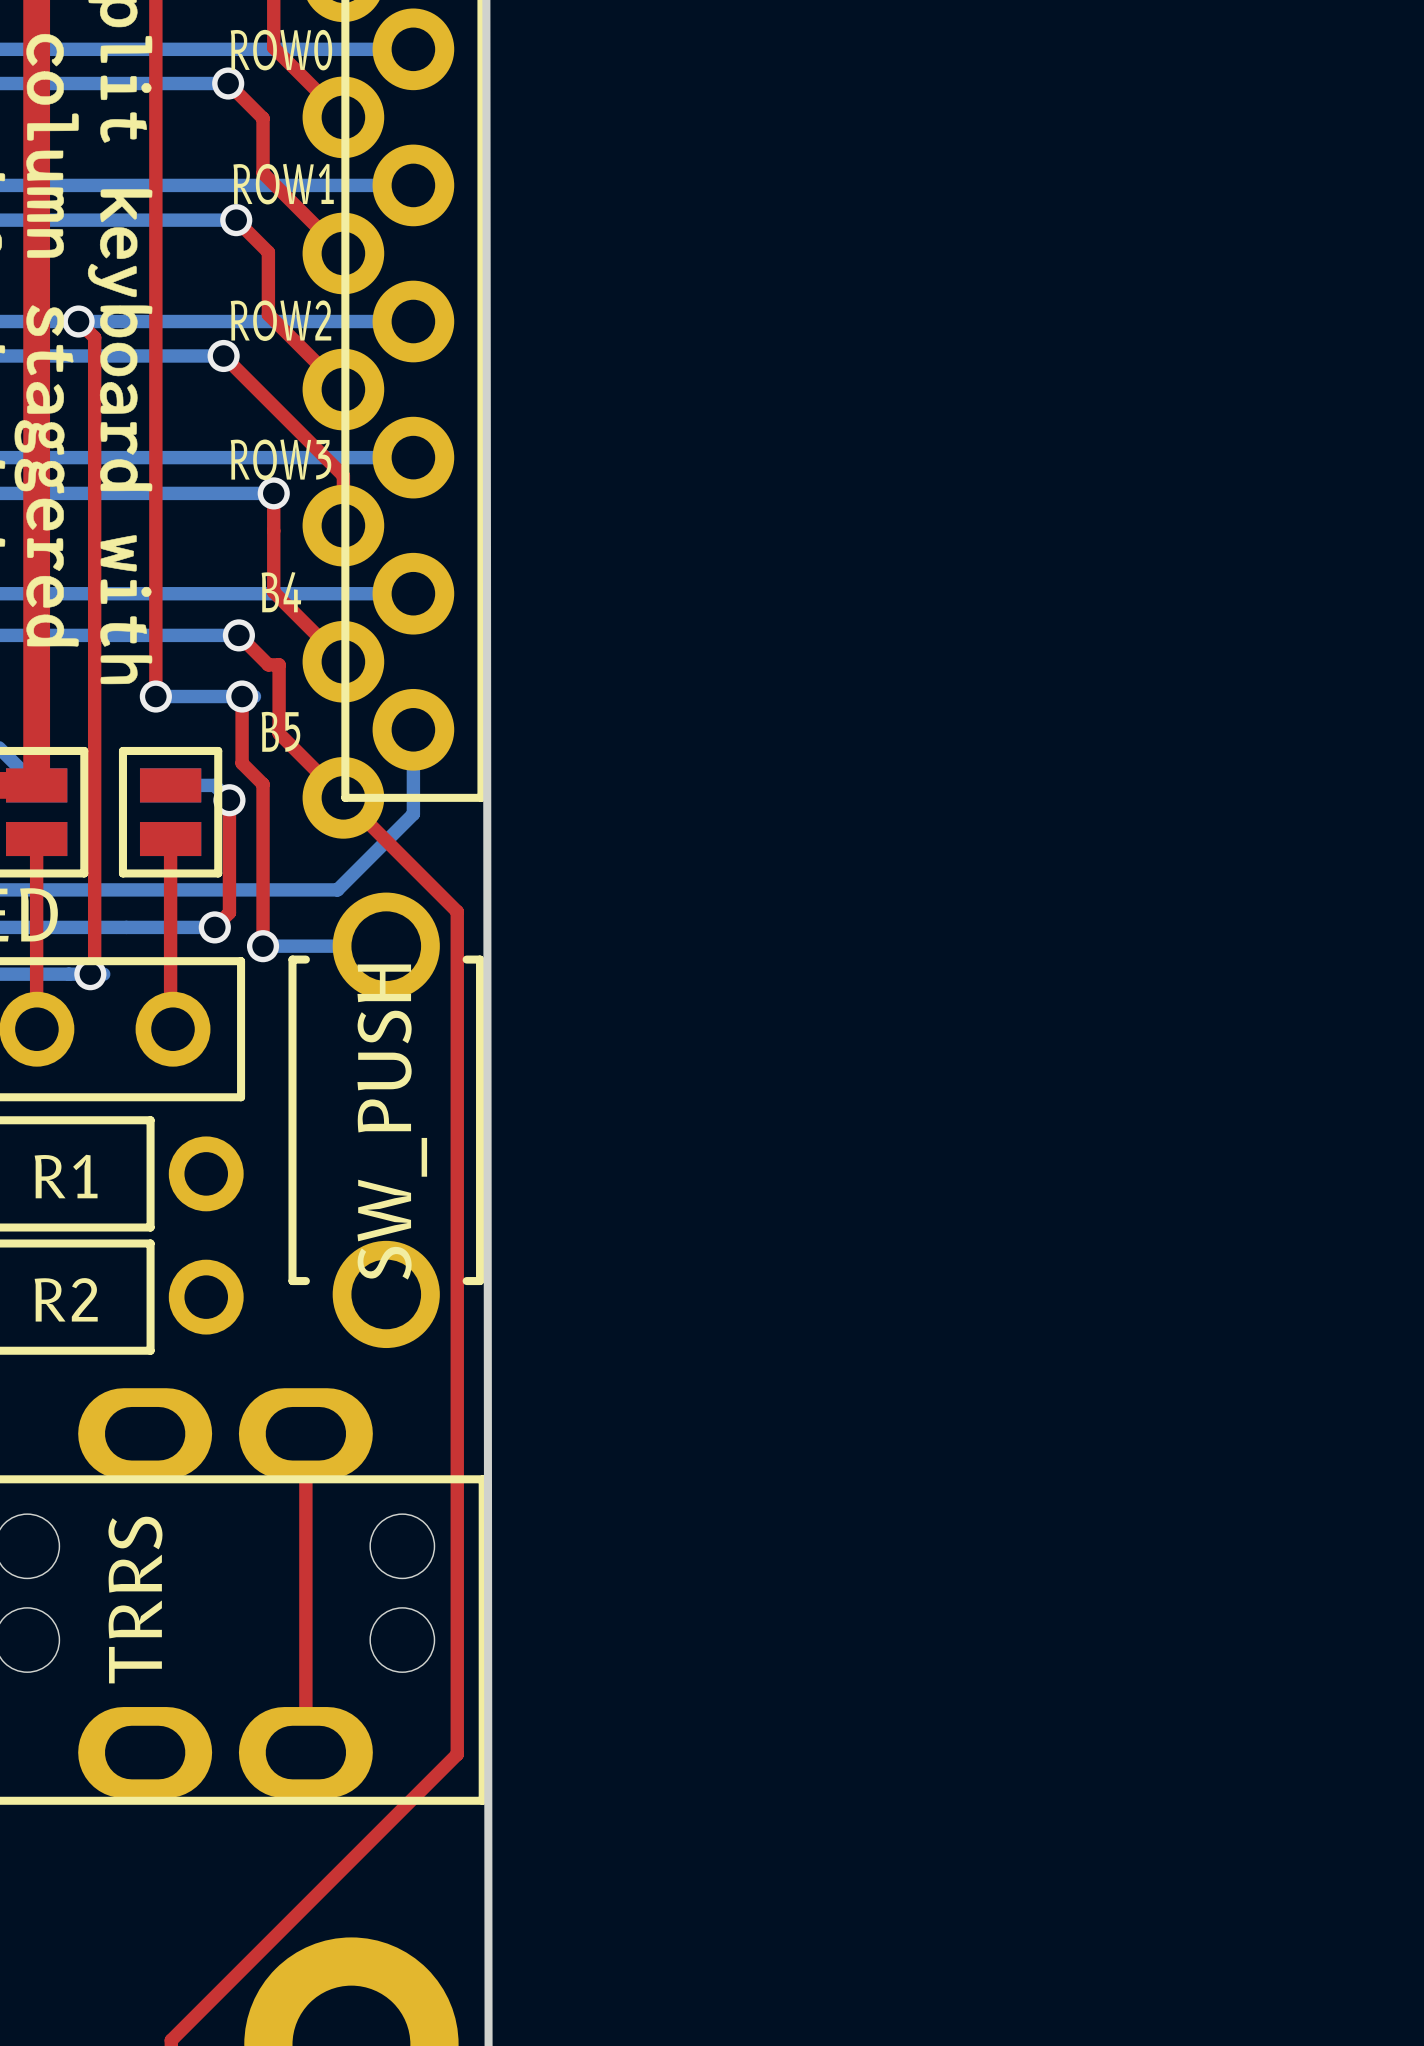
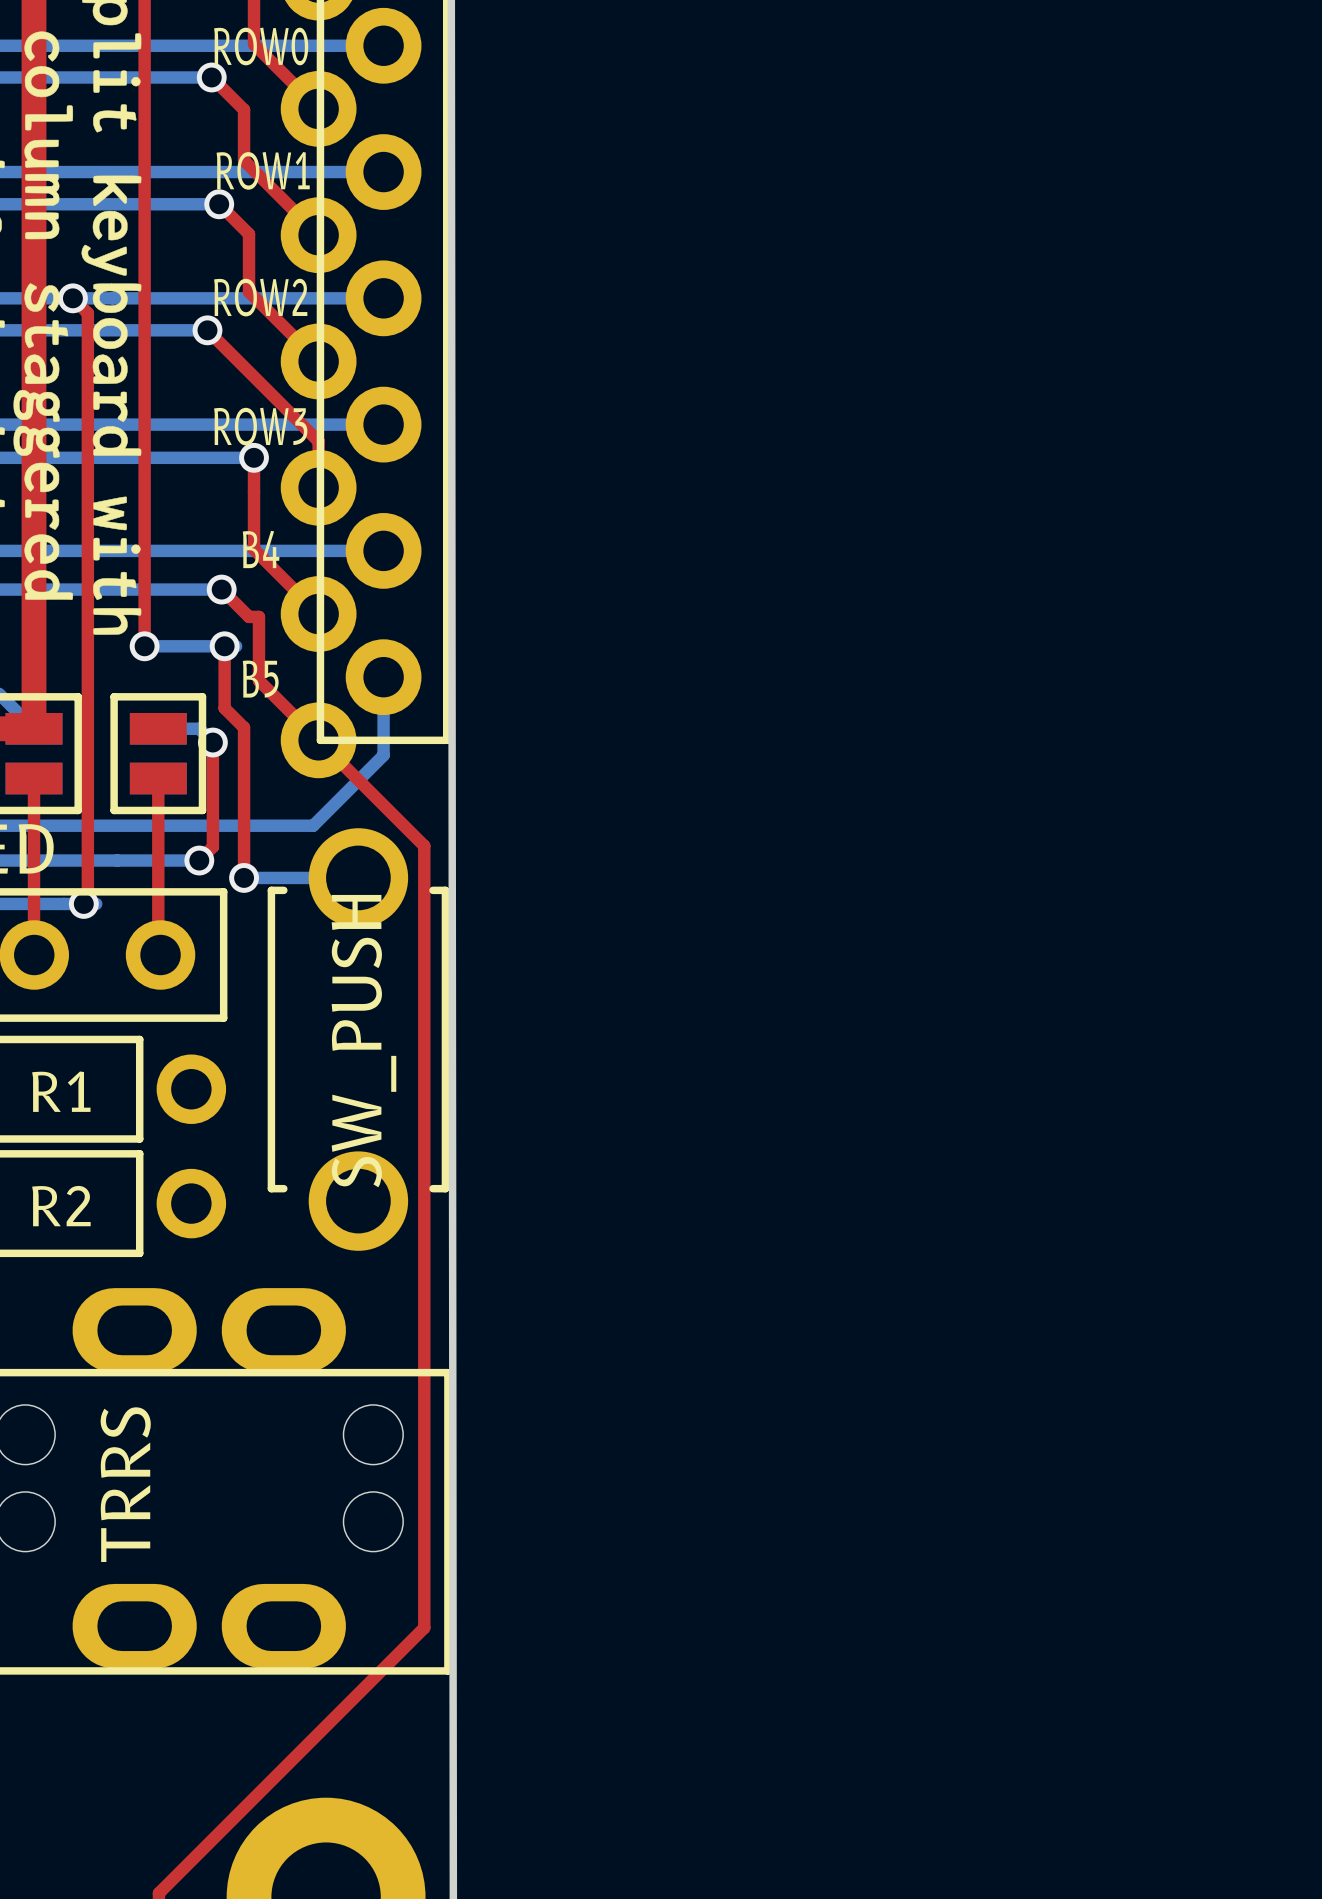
top track: (305, 1433) (305, 1752) -> none

